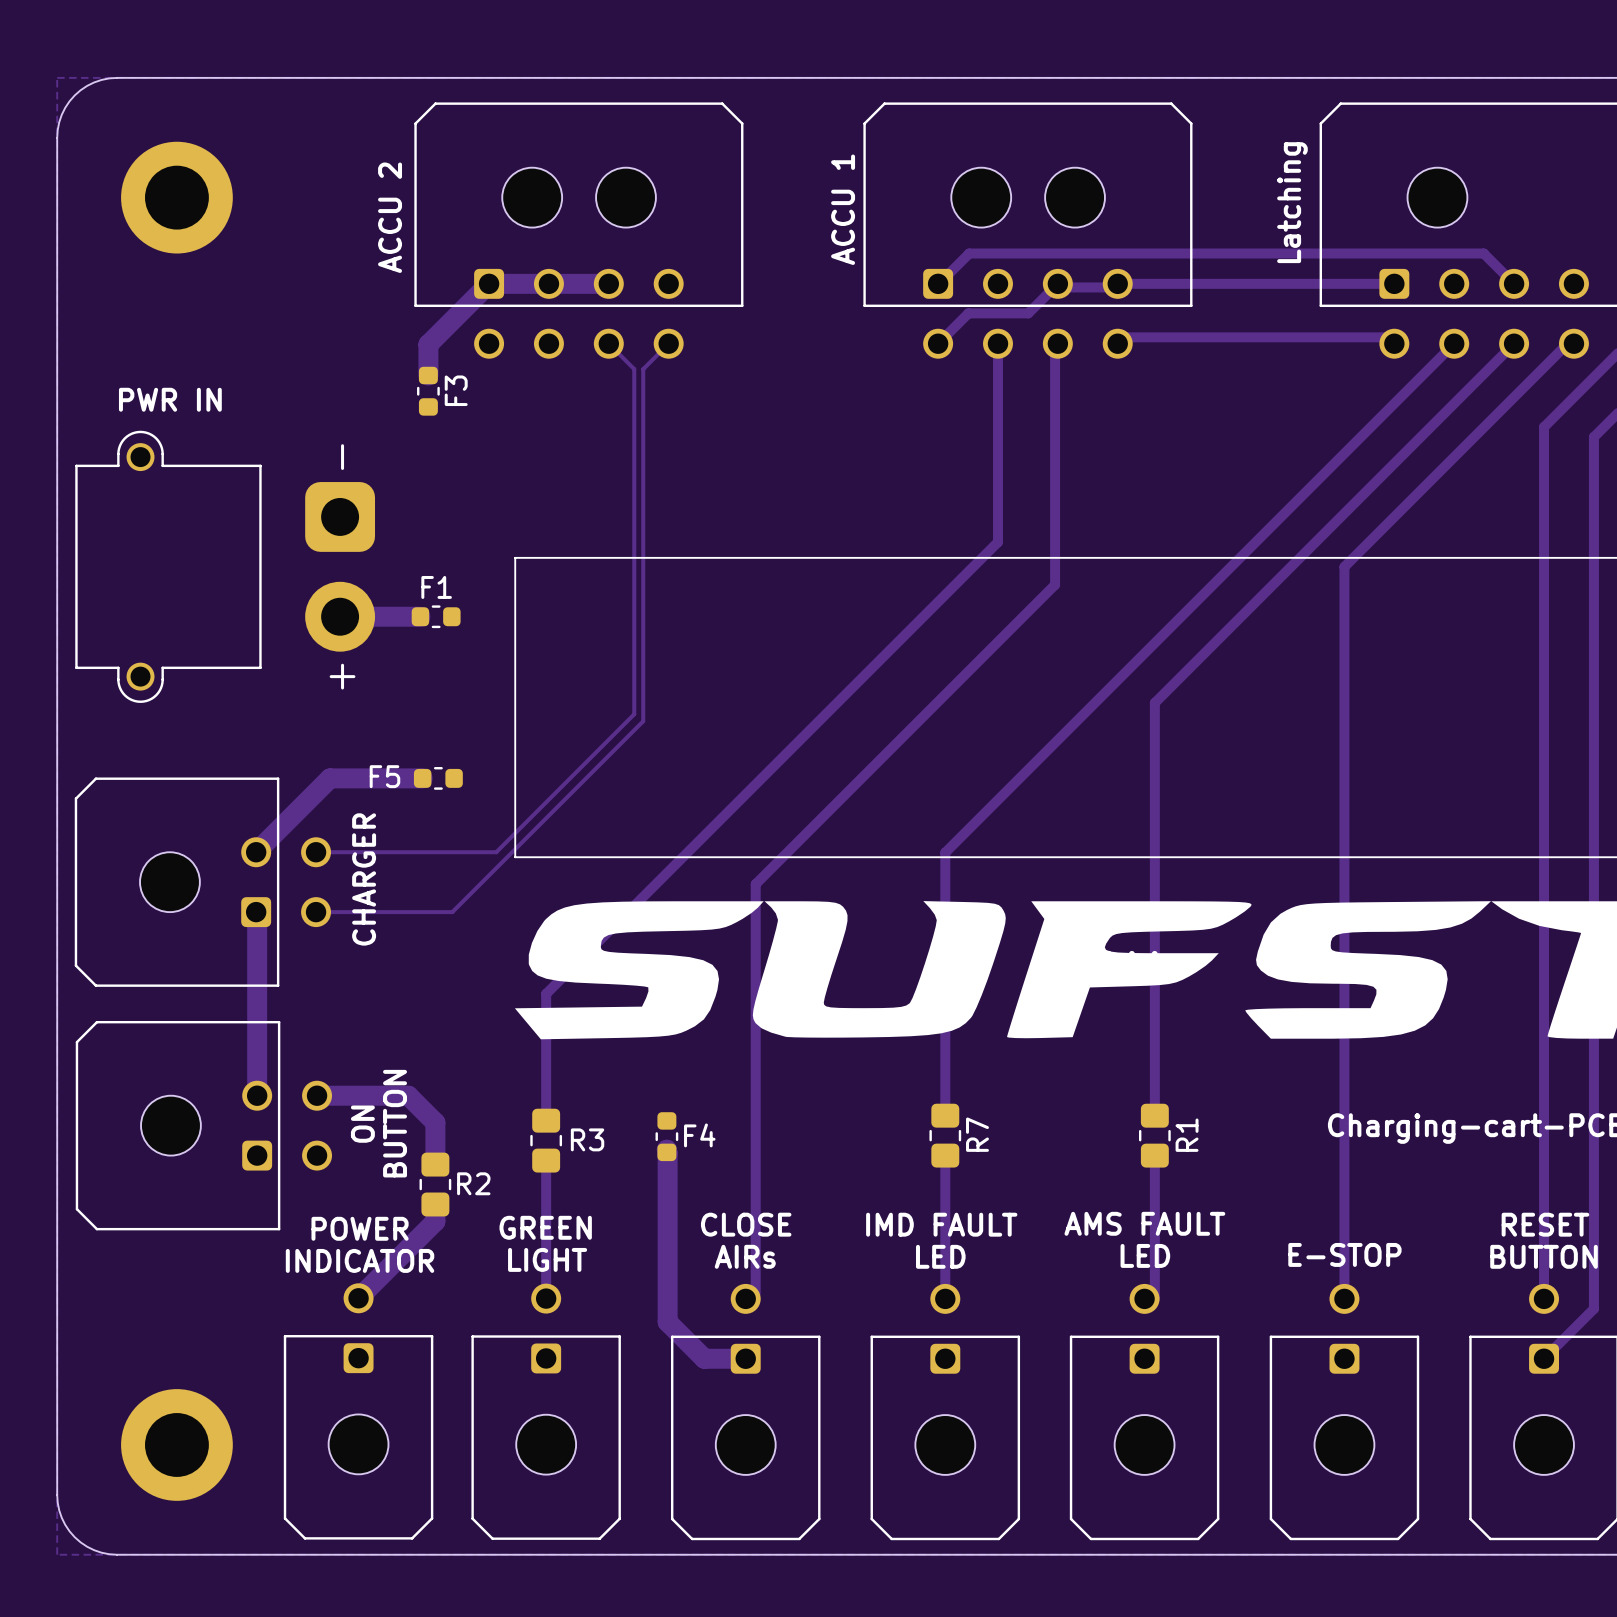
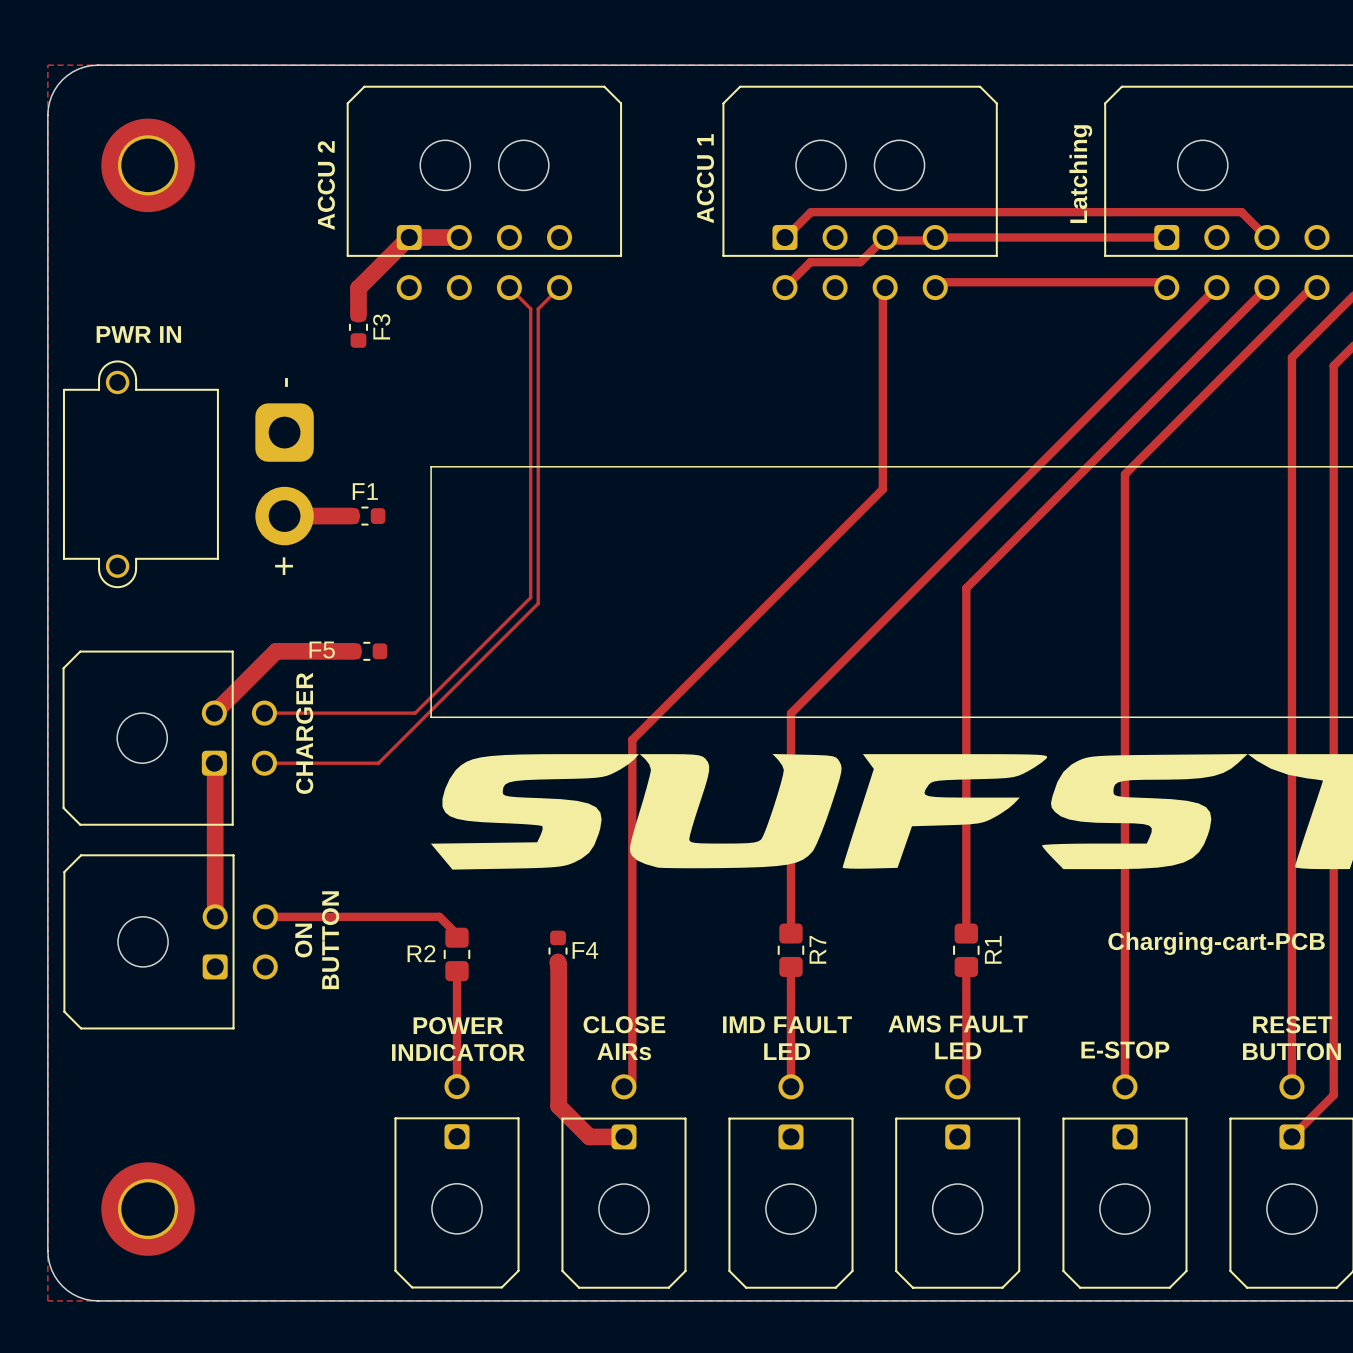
track: (548, 283) (608, 283) -> none
track: (997, 343) (997, 542) (546, 993) (546, 1120) -> none
track width: thick (317, 1095) (408, 1095) -> thin (265, 916) (341, 916)
track: (408, 1095) (435, 1122) (435, 1164) -> (341, 916) (439, 916) (456, 934)
R3 name: R3 (587, 1139) -> R2 (421, 953)
R2: (435, 1184) -> none
track: (435, 1204) (435, 1221) (358, 1298) -> none
text: GREEN (545, 1227) -> POWER (458, 1025)
text: POWER (360, 1228) -> none
text: LIGHT (547, 1259) -> INDICATOR (458, 1052)
text: INDICATOR (360, 1260) -> none
part: (358, 1411) -> none

